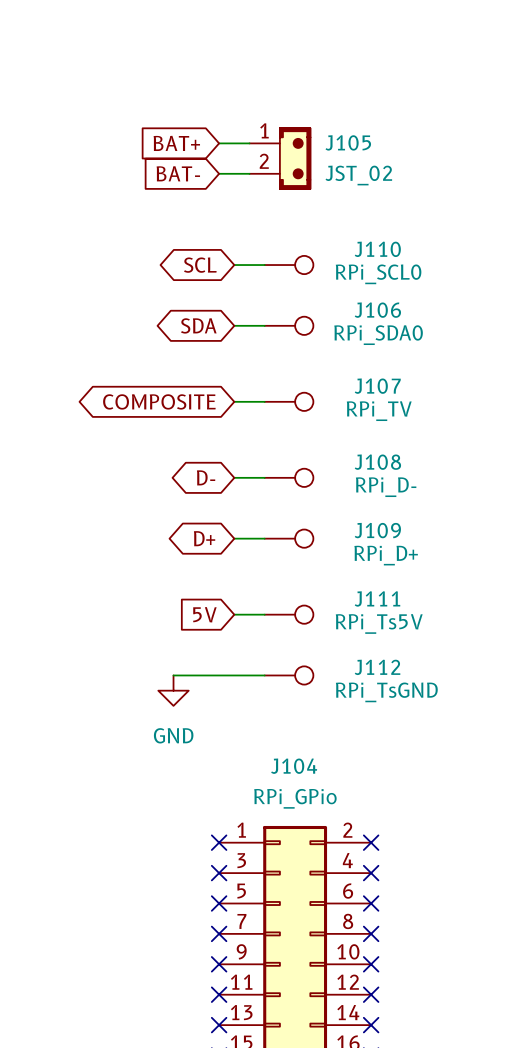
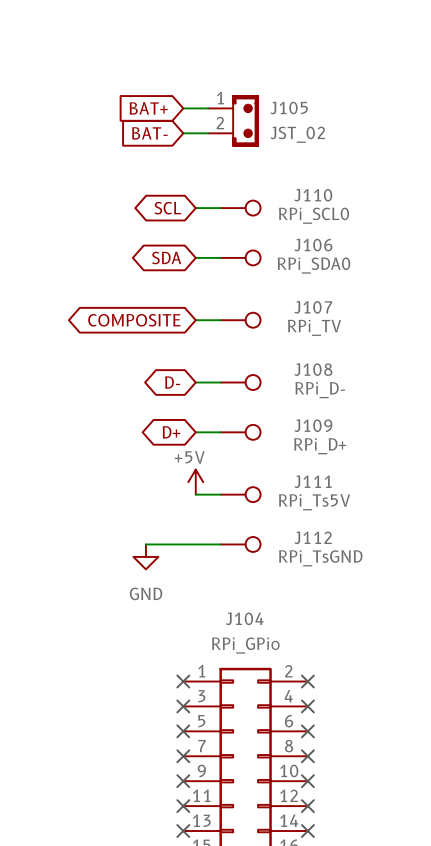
power symbol: none -> +5V (195, 482)
global label: 5V (204, 614) -> none

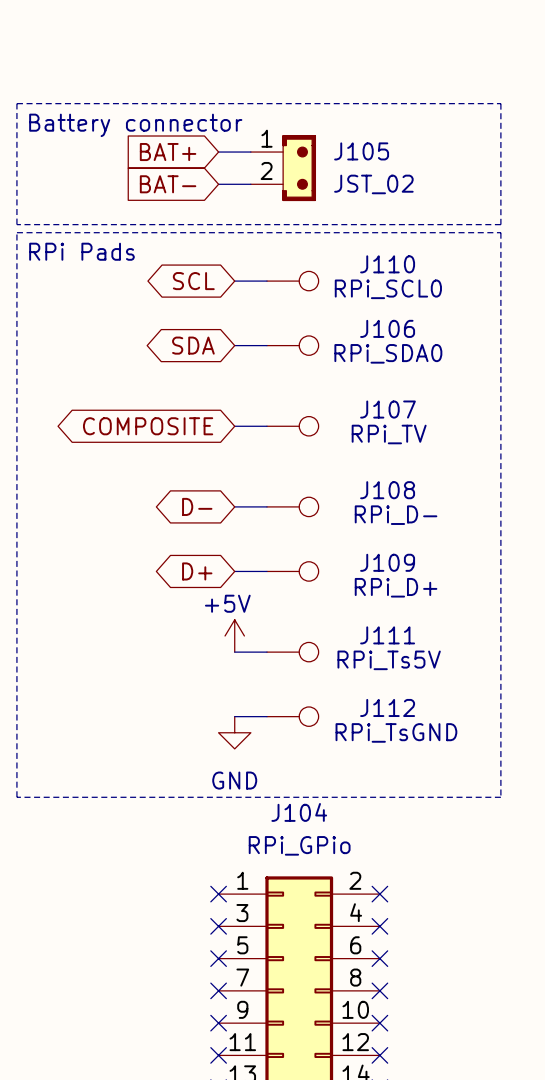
line: none -> (16, 103) (16, 224) (500, 224) (500, 103) (16, 103)
text: none -> Battery connector (135, 125)
line: none -> (16, 232) (500, 232) (500, 797) (16, 797) (16, 232)
text: none -> RPi Pads (81, 251)
wire: (145, 544) (195, 544) -> none
power symbol position: GND (145, 556) -> GND (234, 732)

